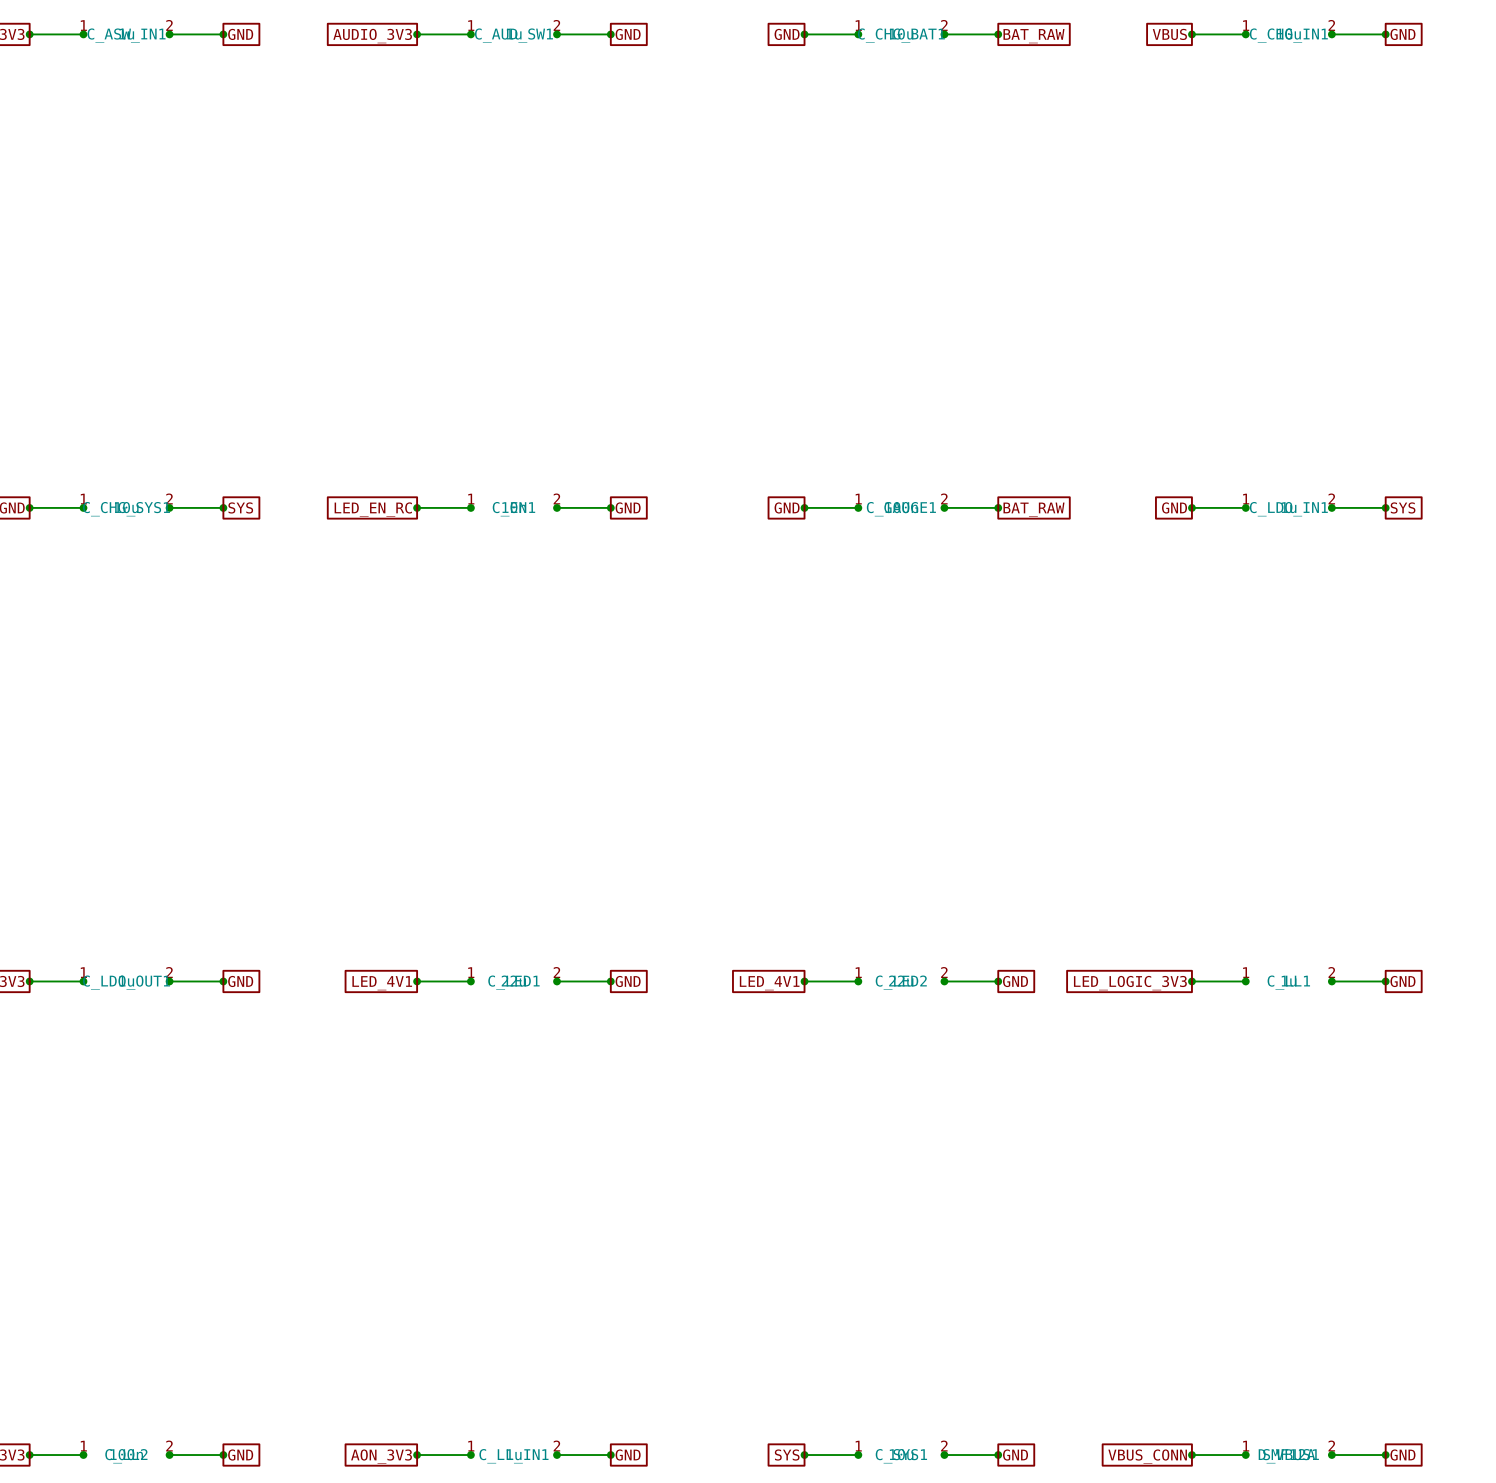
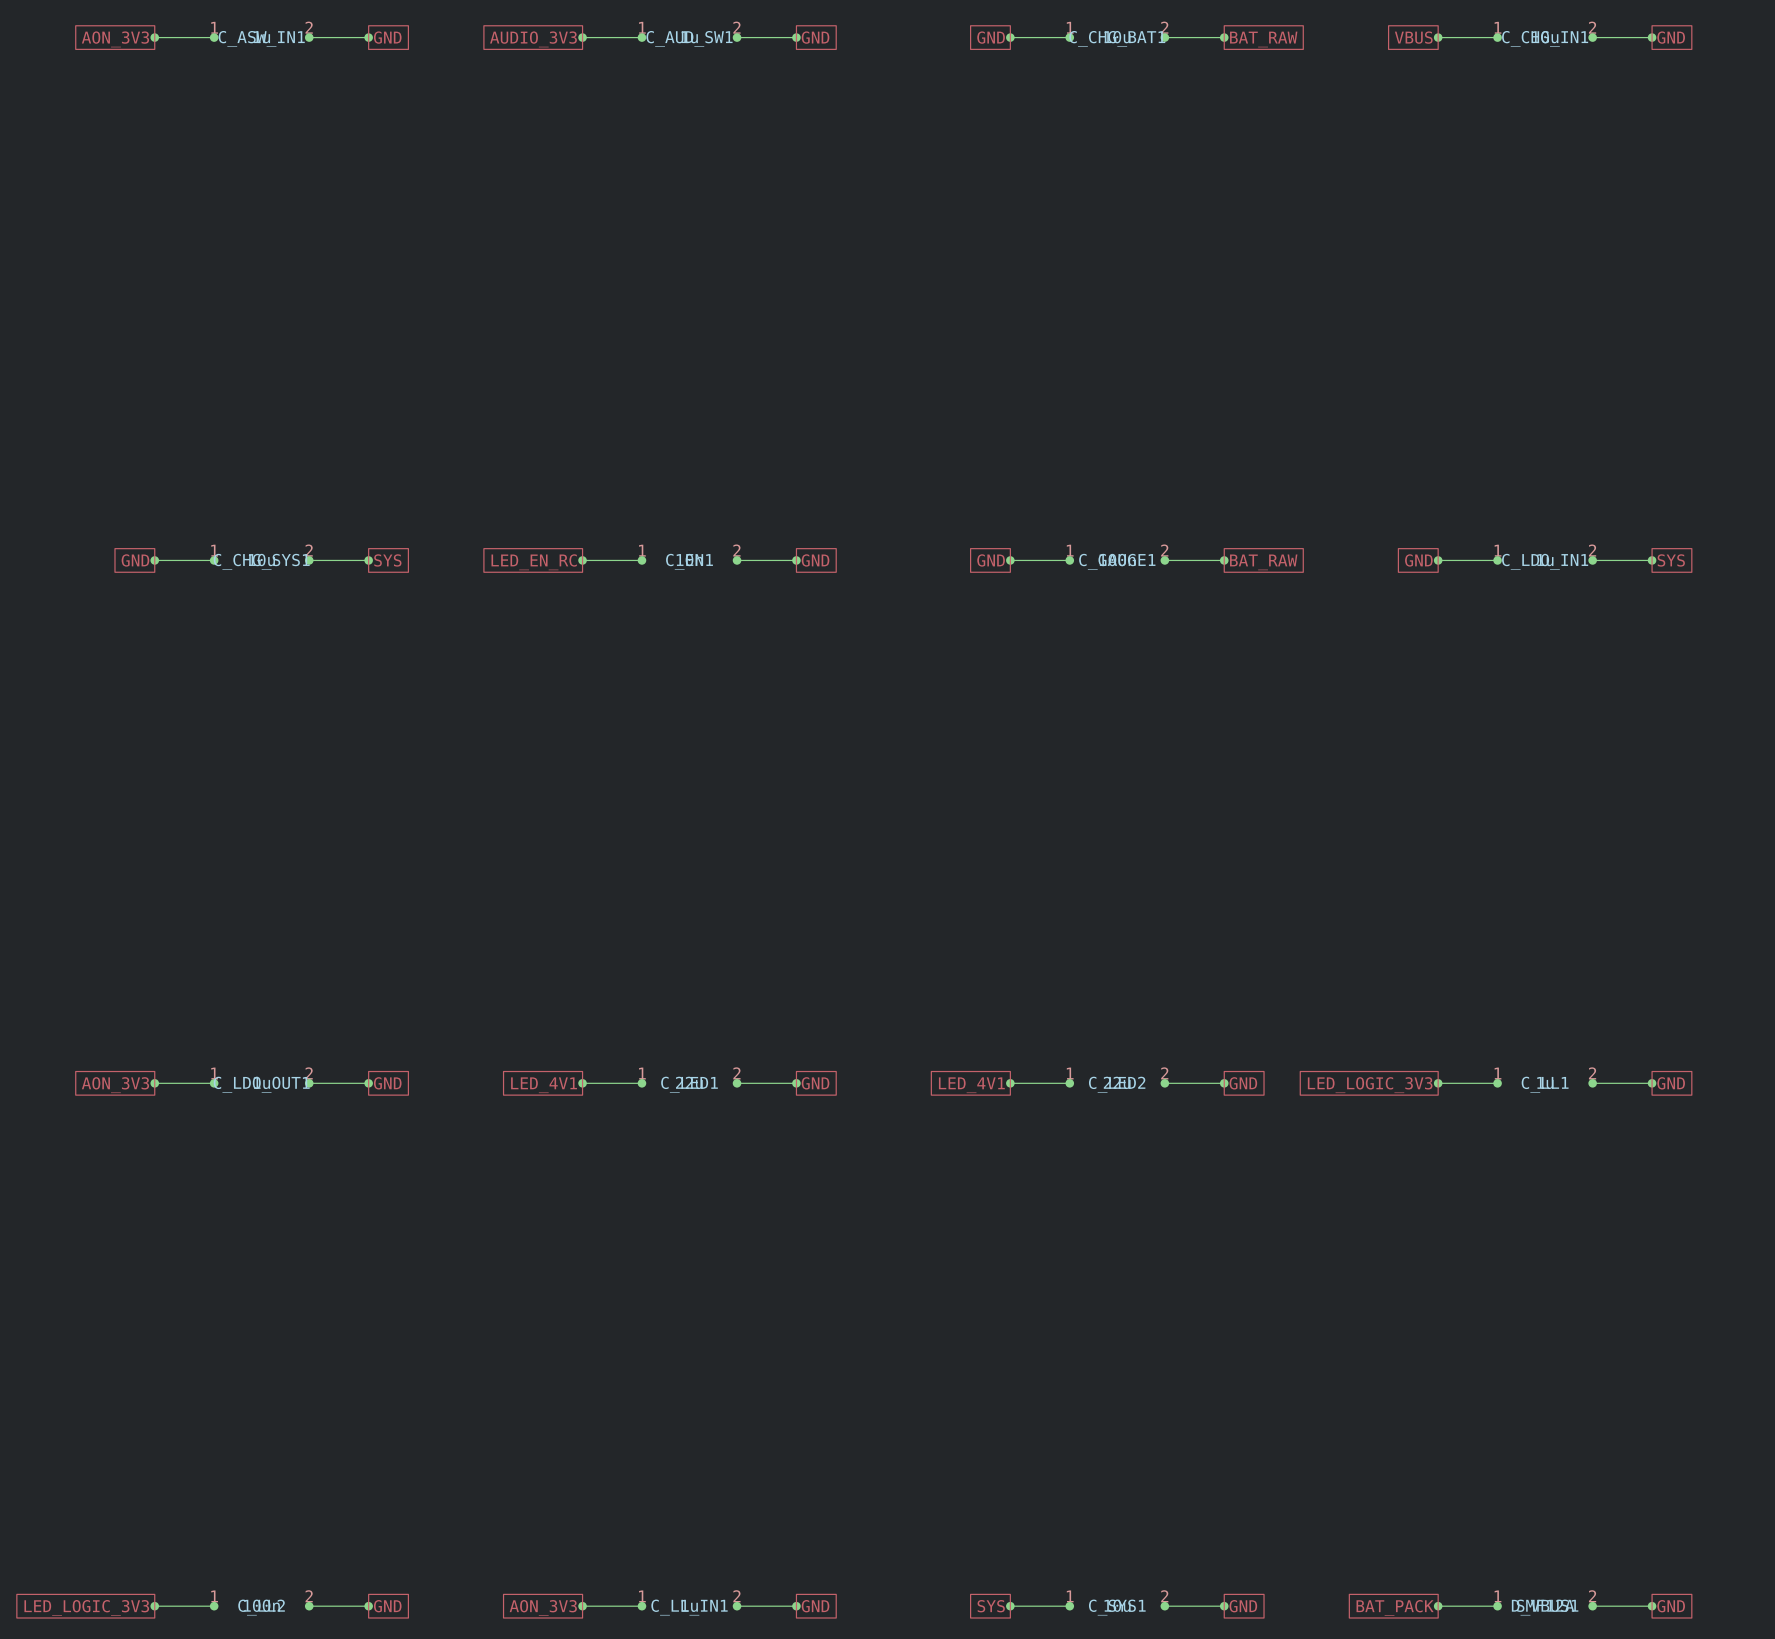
global label: VBUS_CONN (1147, 1456) -> BAT_PACK (1395, 1608)

